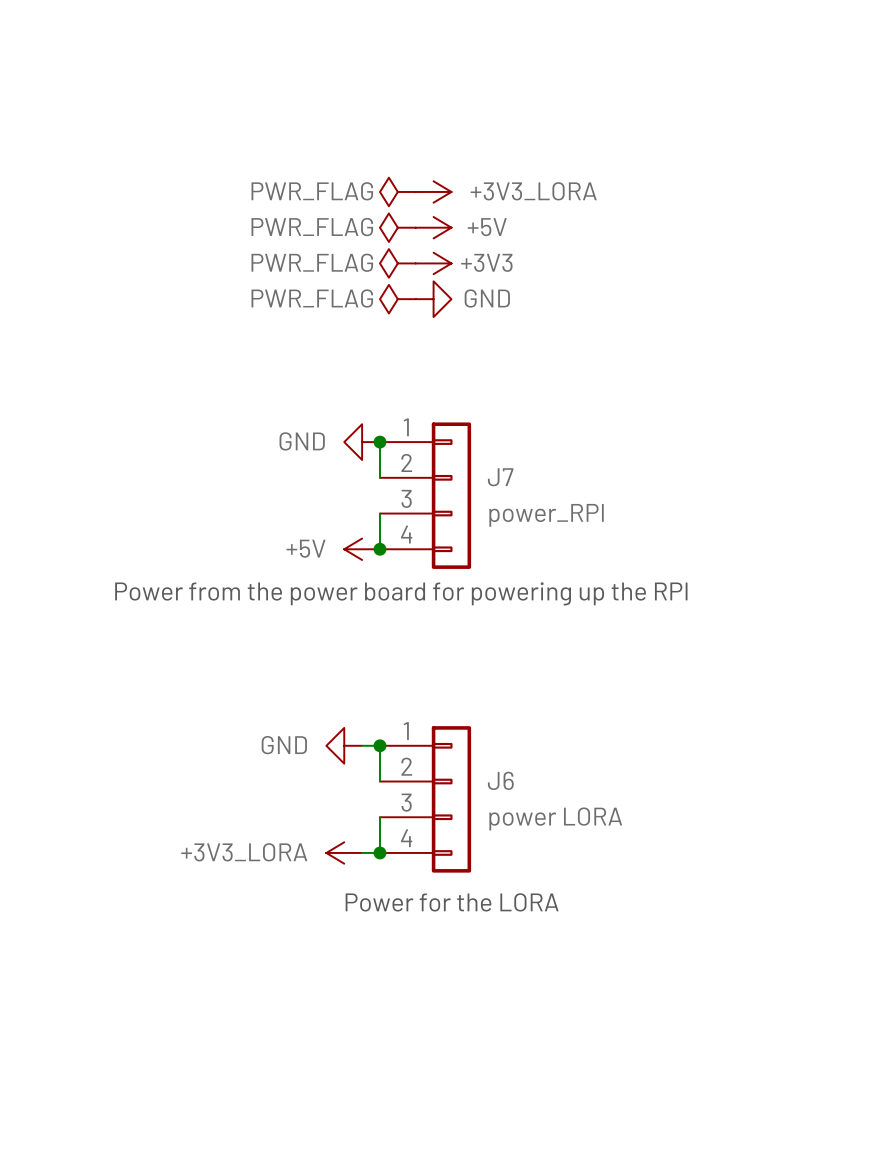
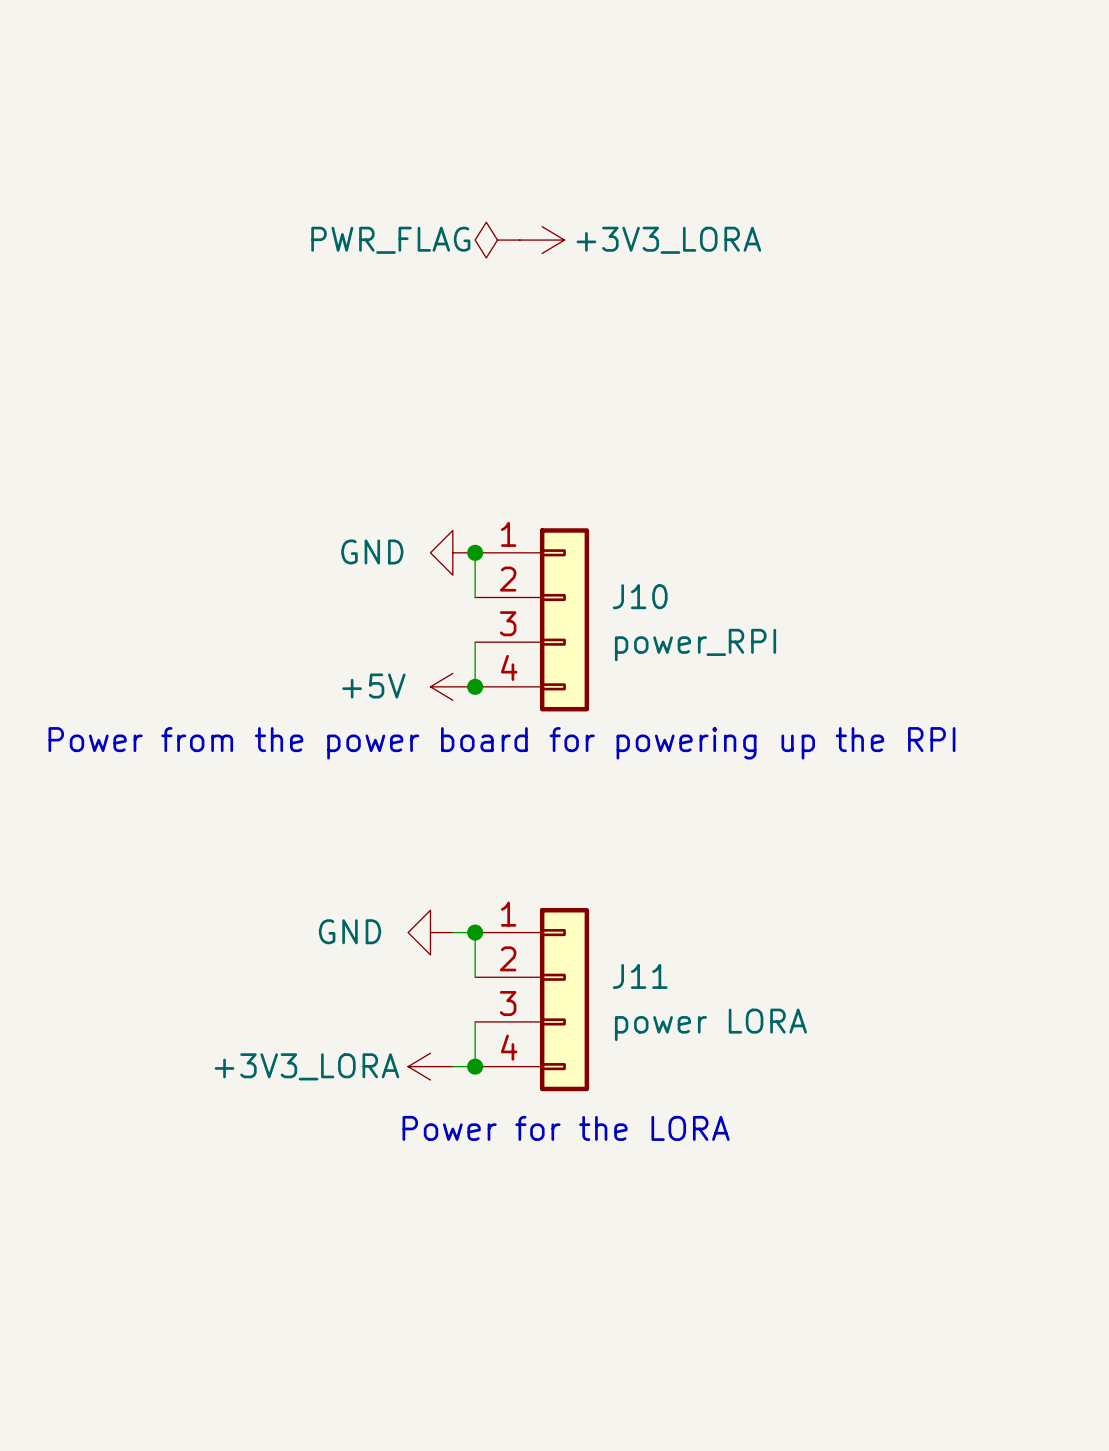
power symbol: PWR_FLAG (397, 227) -> none
power symbol: +5V (433, 227) -> none
power symbol: PWR_FLAG (397, 263) -> none
power symbol: +3V3 (433, 263) -> none
power symbol: PWR_FLAG (397, 299) -> none
power symbol: GND (433, 299) -> none
J7 name: J7 (500, 477) -> J10 (640, 596)
J6 name: J6 (500, 780) -> J11 (640, 976)

